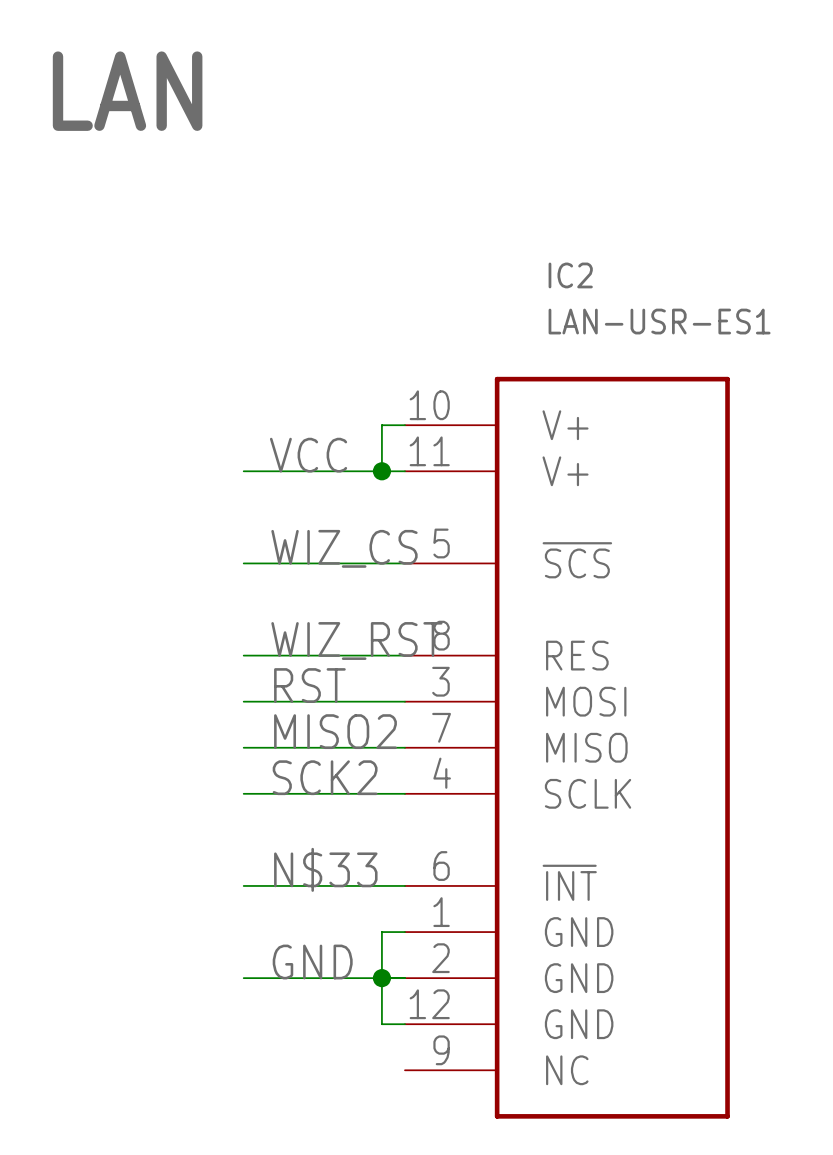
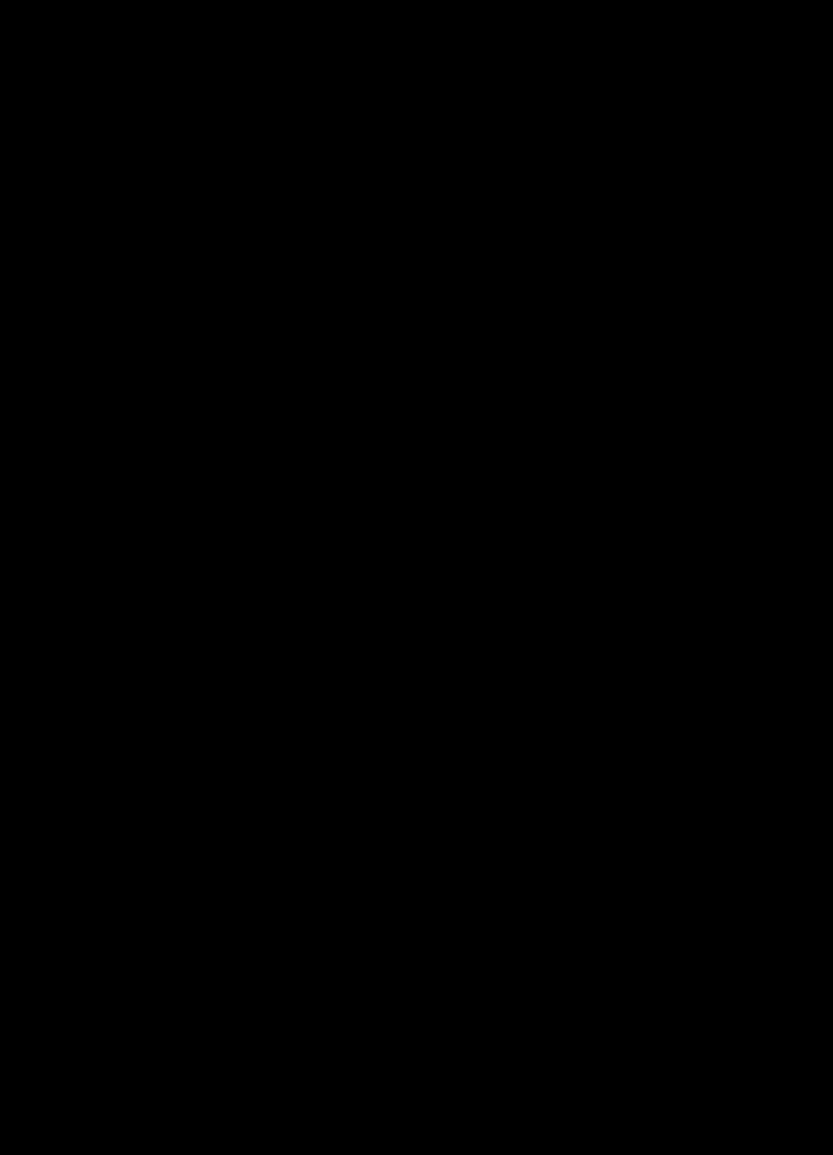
text: LAN (127, 91) -> none
wire: (404, 425) (381, 425) (381, 471) -> none
label: VCC (308, 455) -> none
wire: (243, 471) (404, 471) -> none
junction: (381, 471) -> none
label: WIZ_CS (344, 548) -> none
wire: (243, 563) (404, 563) -> none
label: WIZ_RST (356, 641) -> none
wire: (243, 655) (404, 655) -> none
label: RST (309, 685) -> none
wire: (243, 701) (404, 701) -> none
label: MISO2 (335, 731) -> none
wire: (243, 747) (404, 747) -> none
IC2: LAN-USR-ES1 (567, 747) -> none
label: SCK2 (325, 777) -> none
wire: (243, 793) (404, 793) -> none
label: N$33 (325, 869) -> none
wire: (243, 885) (404, 885) -> none
wire: (404, 932) (381, 932) (381, 1024) (404, 1024) -> none
label: GND (312, 962) -> none
wire: (243, 978) (404, 978) -> none
junction: (381, 978) -> none

